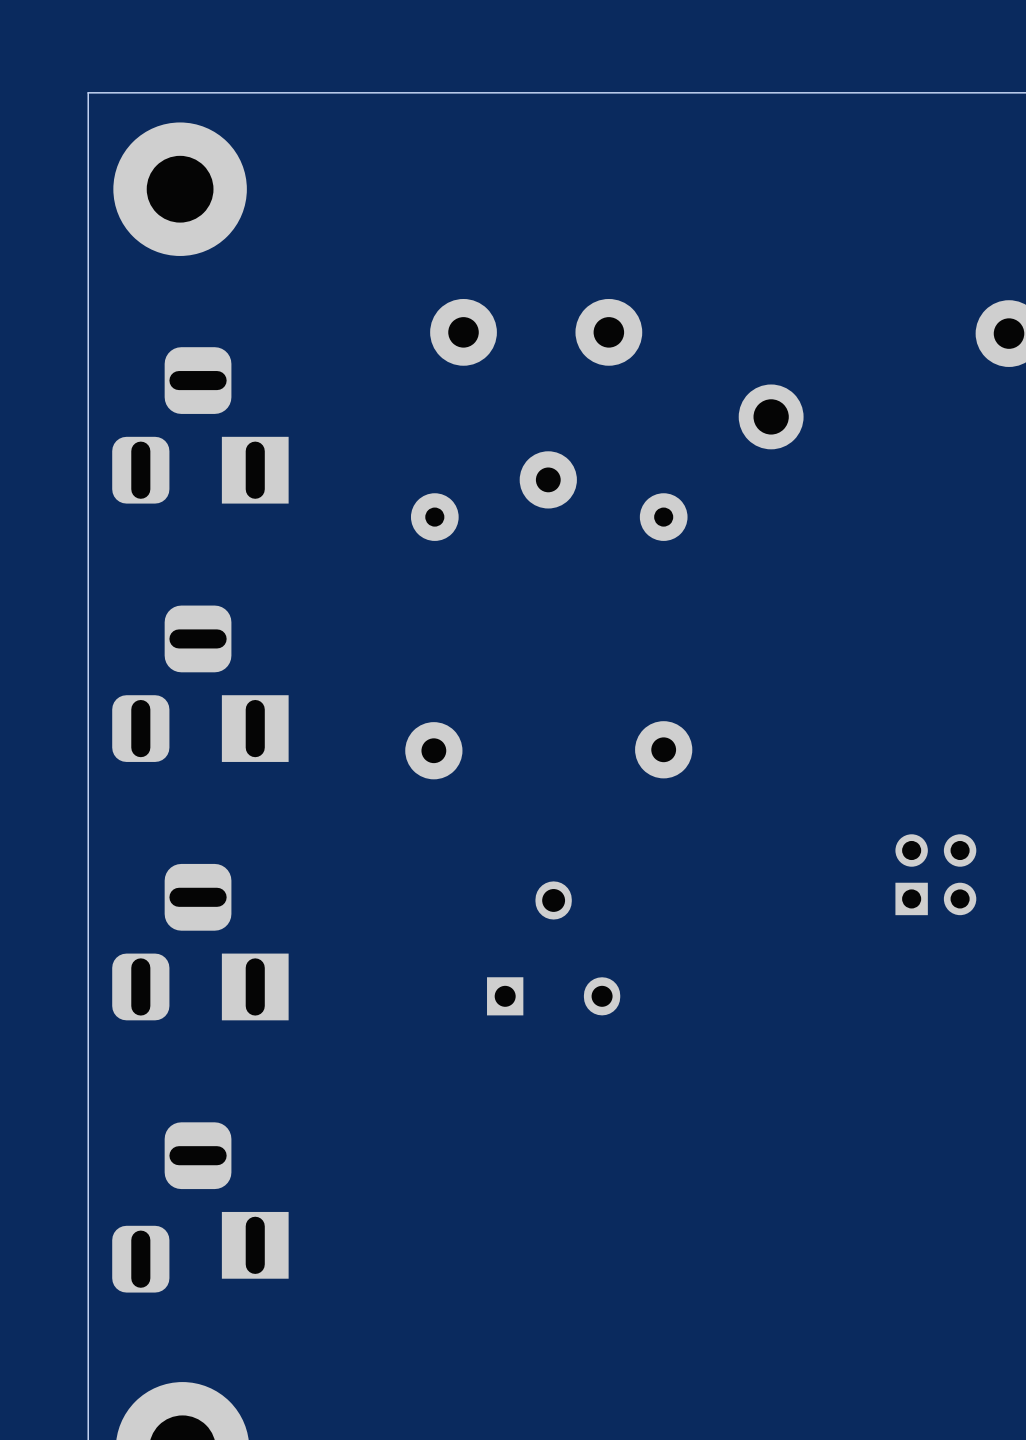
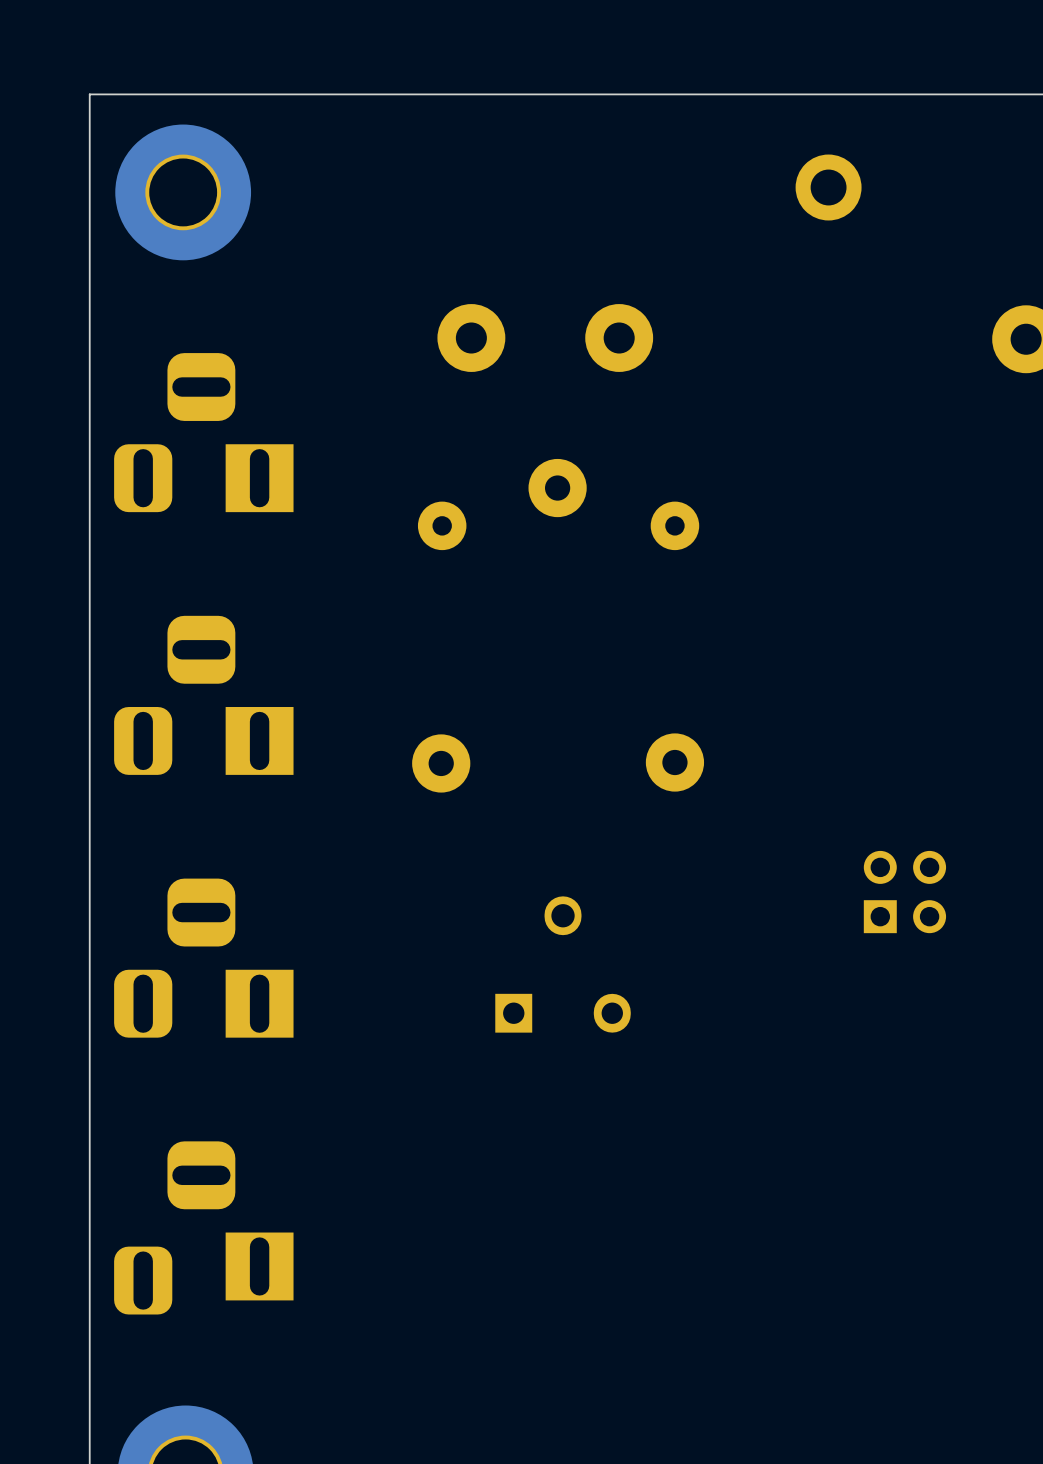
part position: (771, 416) -> (828, 187)
part position: (935, 874) -> (904, 892)

